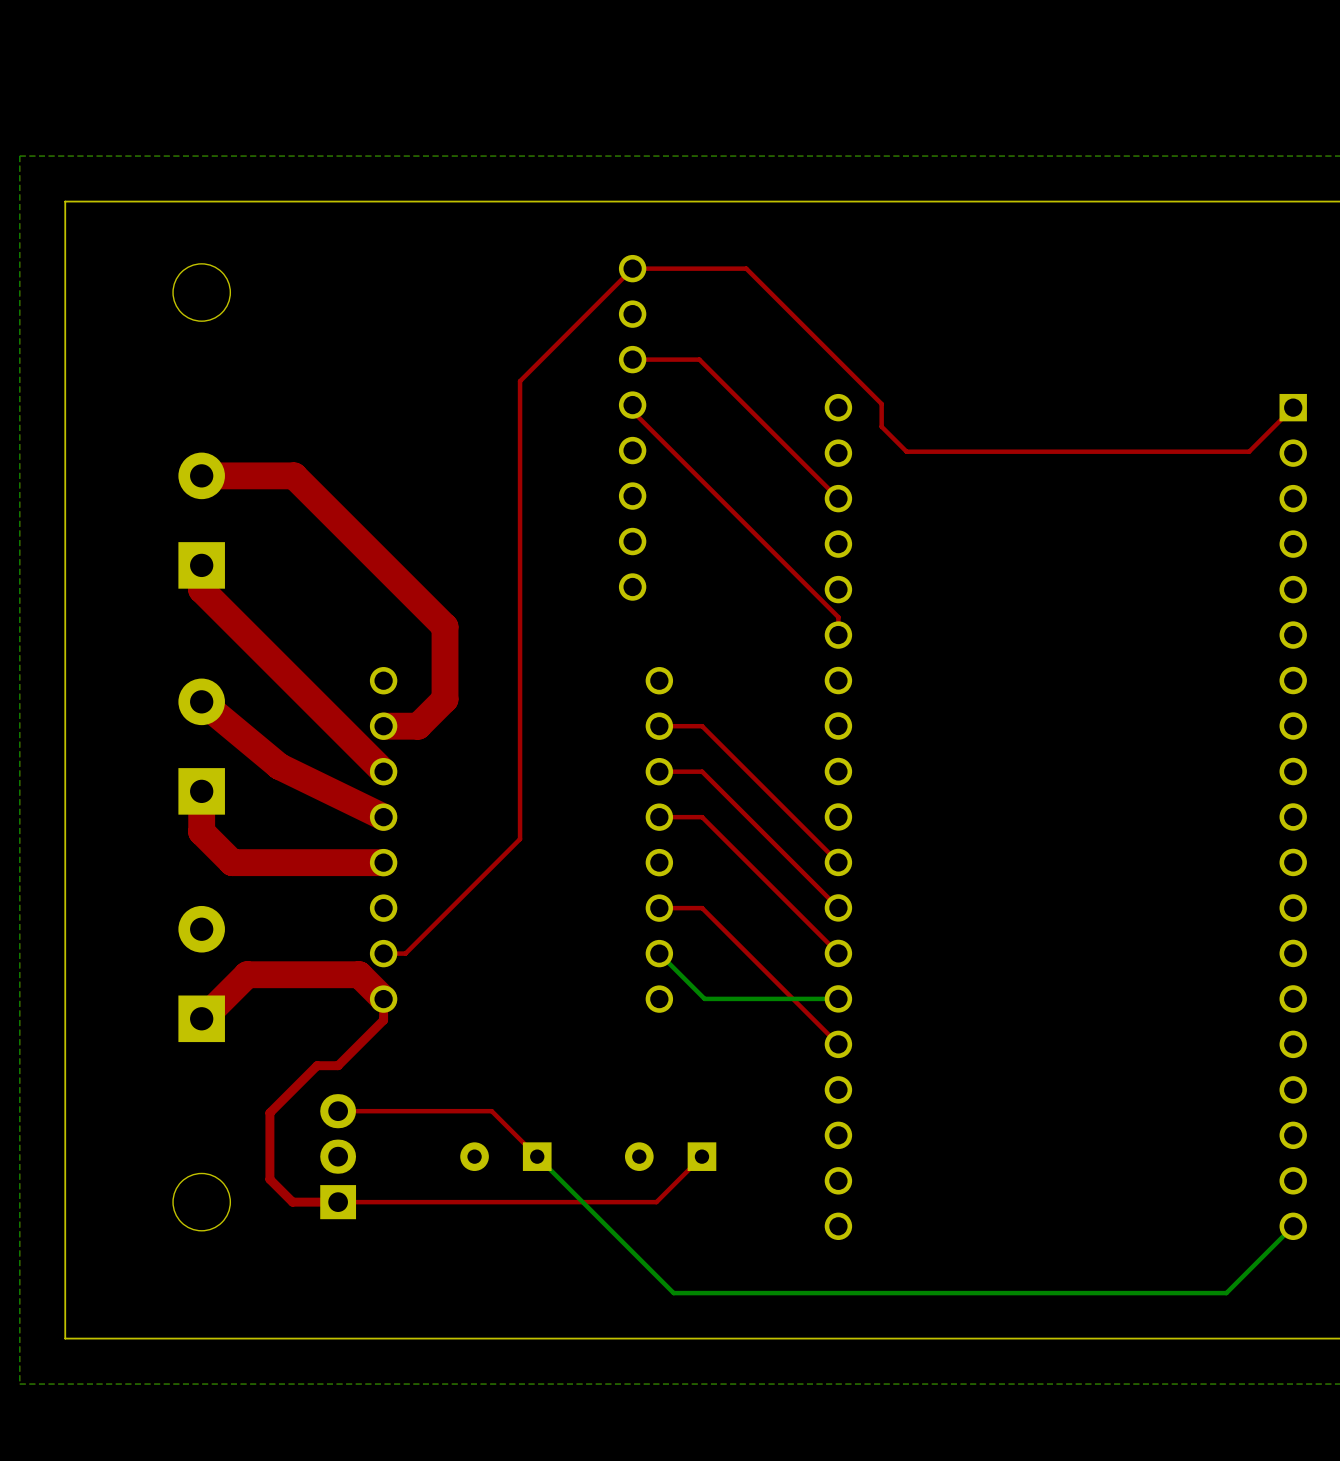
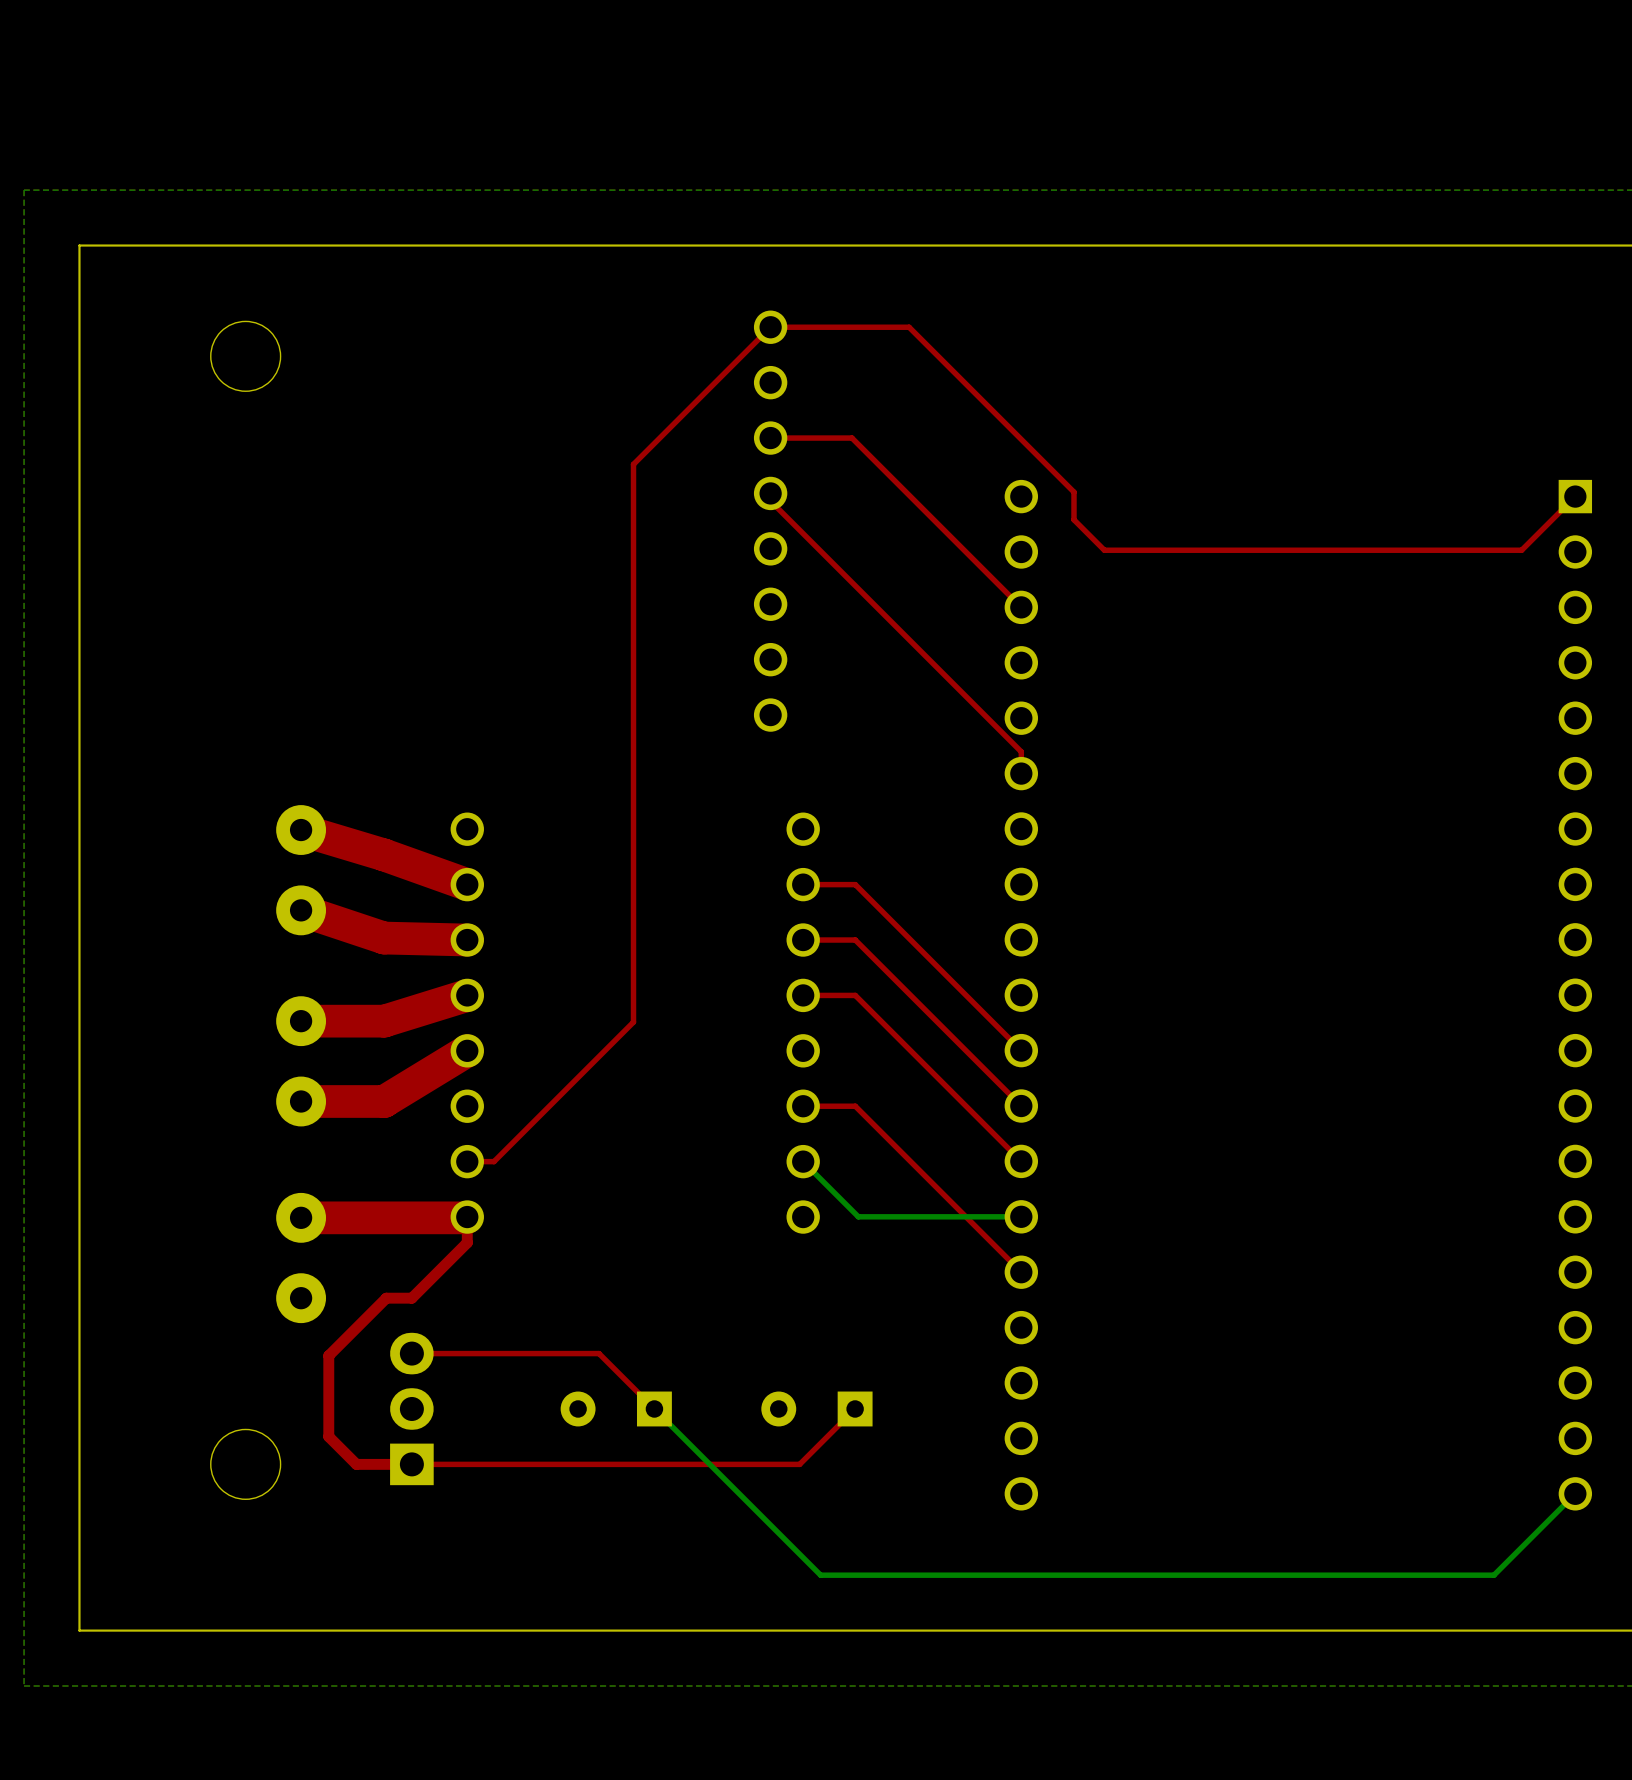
top track: (201, 475) (294, 475) (445, 626) (445, 699) (418, 726) (383, 726) -> (301, 830) (384, 854) (467, 884)
part: (201, 520) -> none
top track: (201, 565) (201, 589) (383, 771) -> (301, 910) (384, 938) (467, 940)
top track: (201, 701) (279, 766) (383, 817) -> (301, 1021) (384, 1021) (467, 995)
part: none -> (301, 870)
part: (201, 746) -> none
top track: (201, 791) (201, 832) (232, 862) (383, 862) -> (301, 1101) (384, 1101) (467, 1050)
part: none -> (301, 1061)
part: (201, 974) -> none
top track: none -> (466, 1217) (301, 1217)
top track: (383, 999) (359, 974) (247, 974) (201, 1018) -> none
part: none -> (301, 1258)

